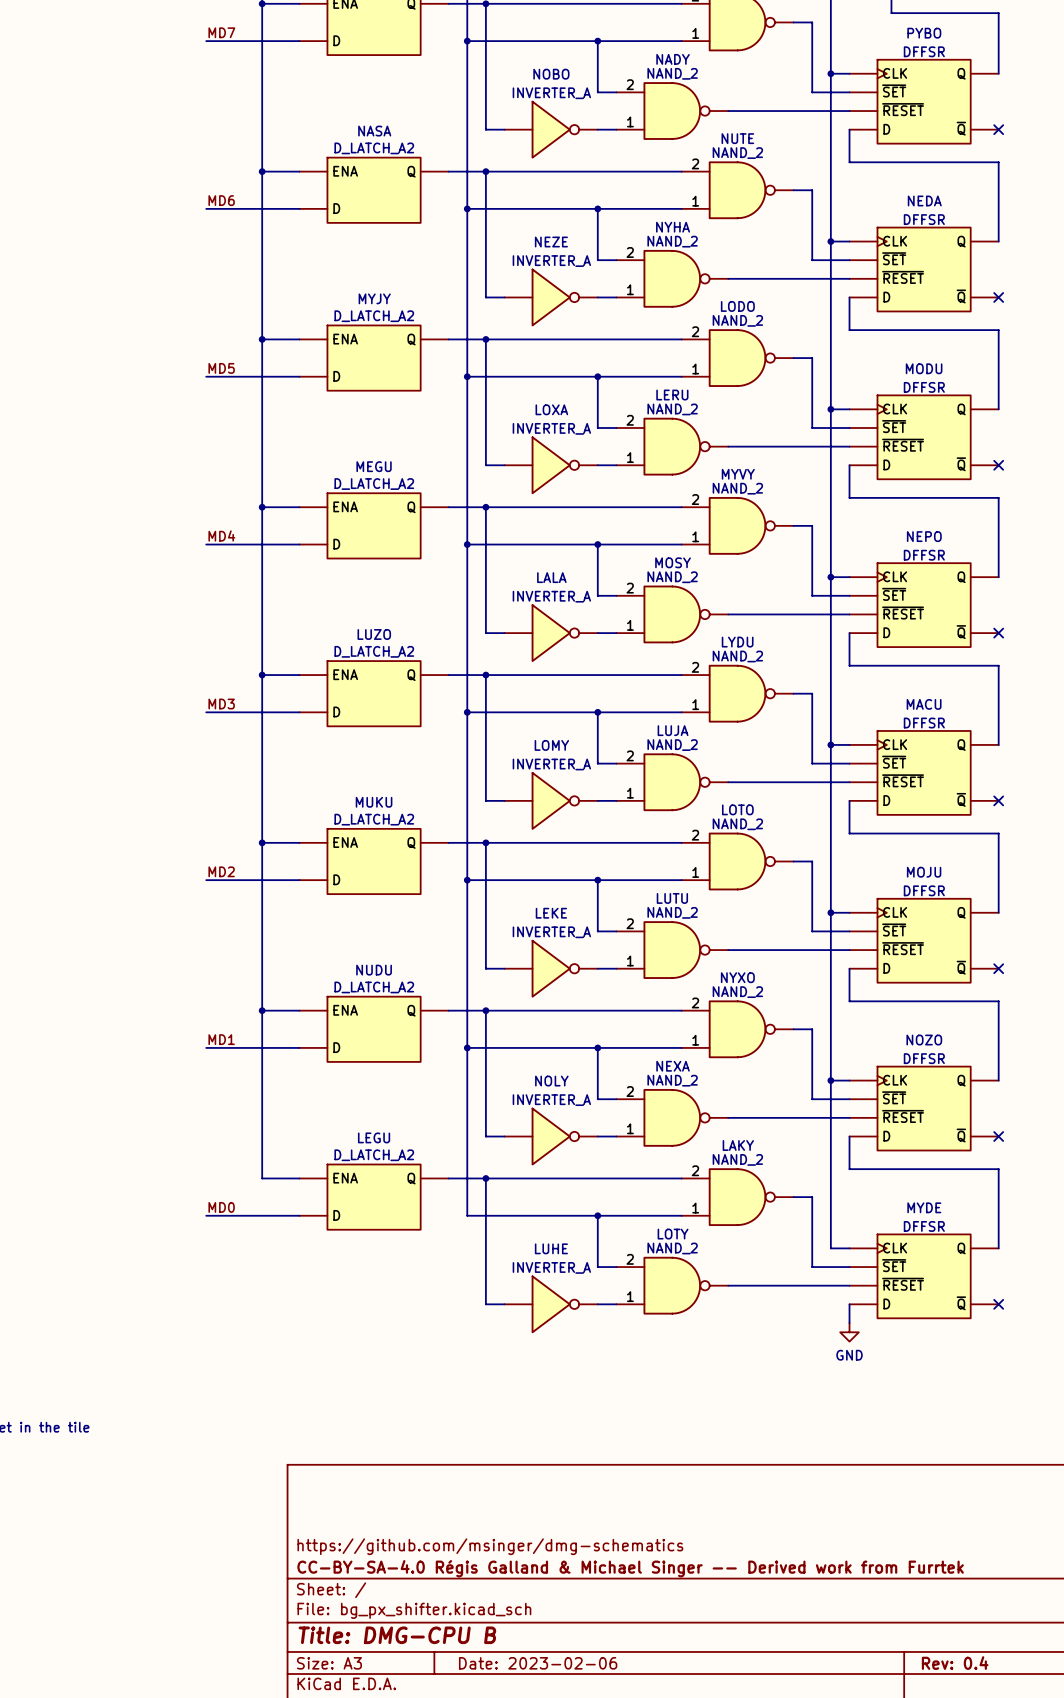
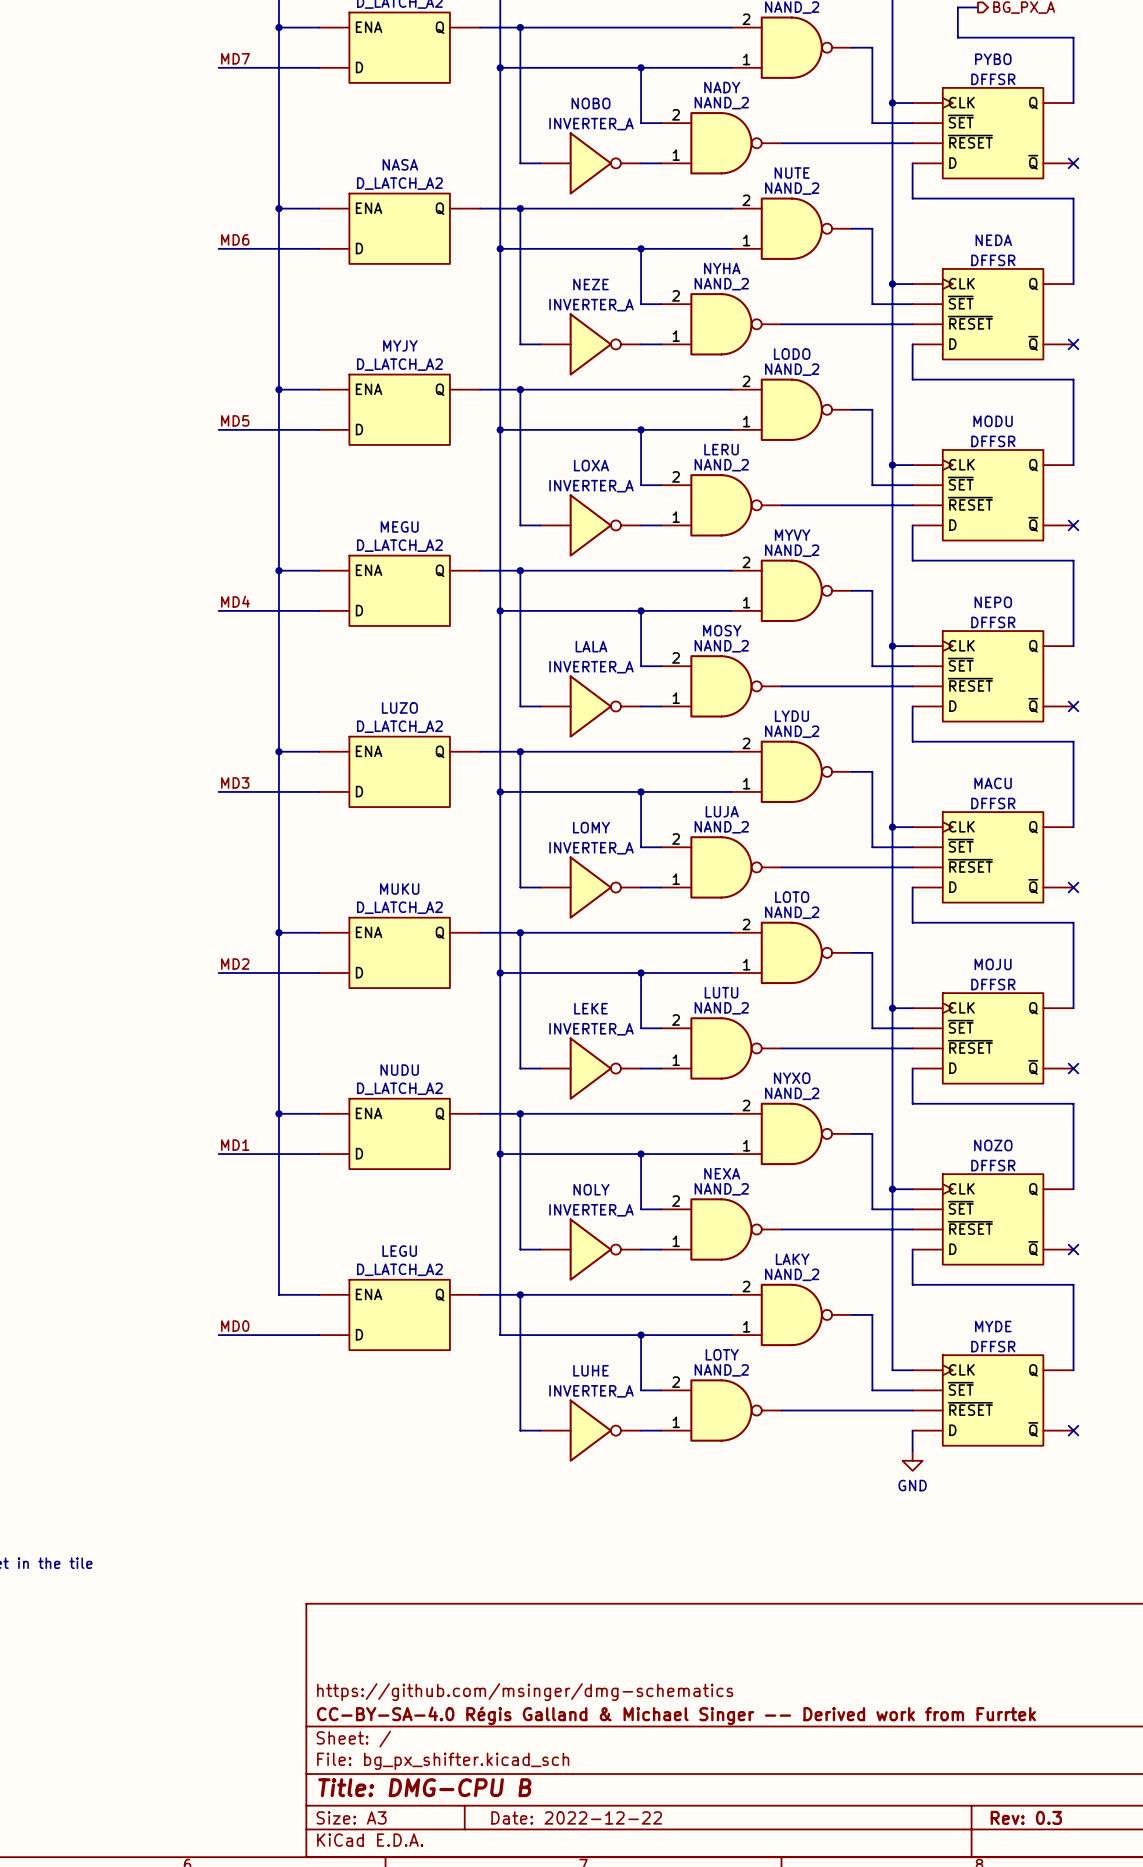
title block: Date: 2023-02-06 (538, 1663) -> Date: 2022-12-22 (576, 1817)
title block: Rev: 0.4 (955, 1663) -> Rev: 0.3 (1026, 1817)

